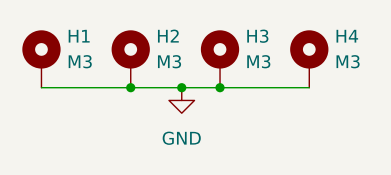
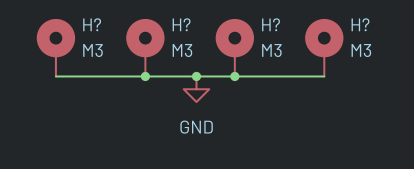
H1 name: H1 (79, 36) -> H? (92, 24)
H2 name: H2 (168, 36) -> H? (181, 24)
H3 name: H3 (257, 36) -> H? (271, 24)
H4 name: H4 (347, 36) -> H? (360, 24)

